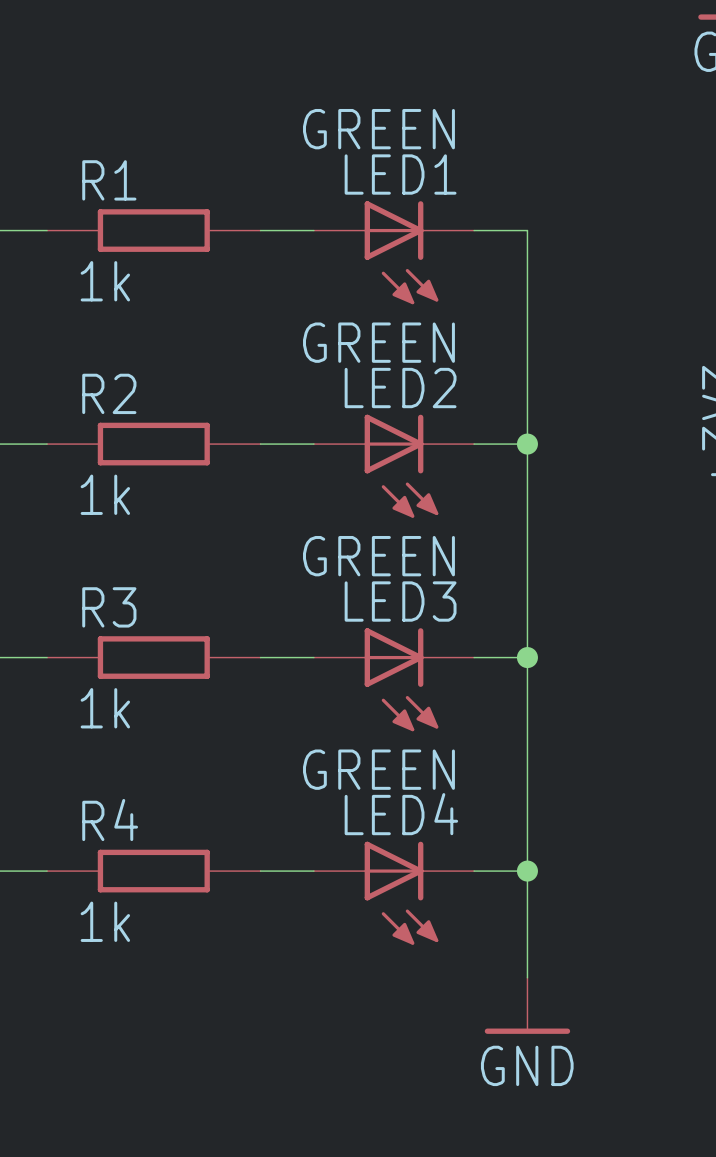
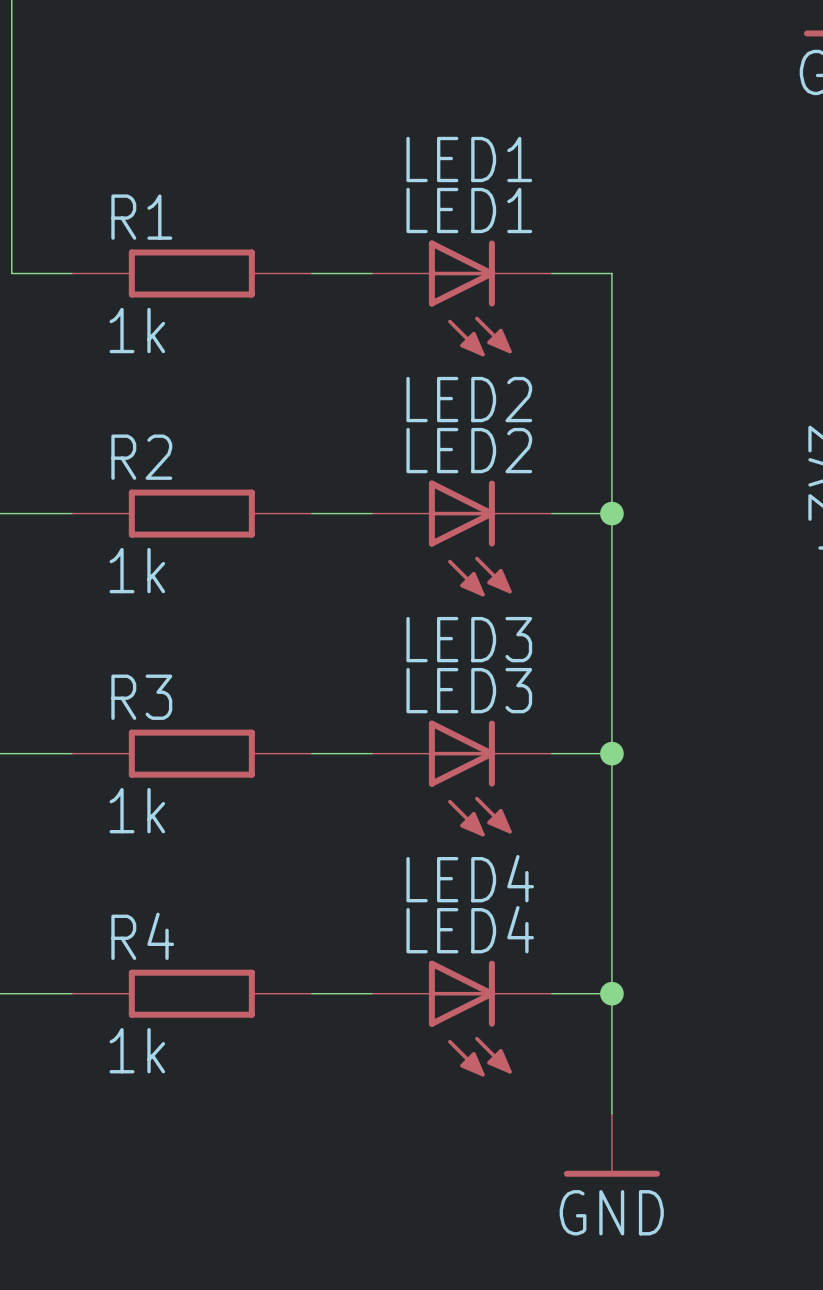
LED1 value: GREEN (378, 129) -> LED1 (469, 159)
LED2 value: GREEN (378, 342) -> LED2 (469, 399)
LED3 value: GREEN (378, 556) -> LED3 (469, 639)
LED4 value: GREEN (378, 769) -> LED4 (470, 878)

